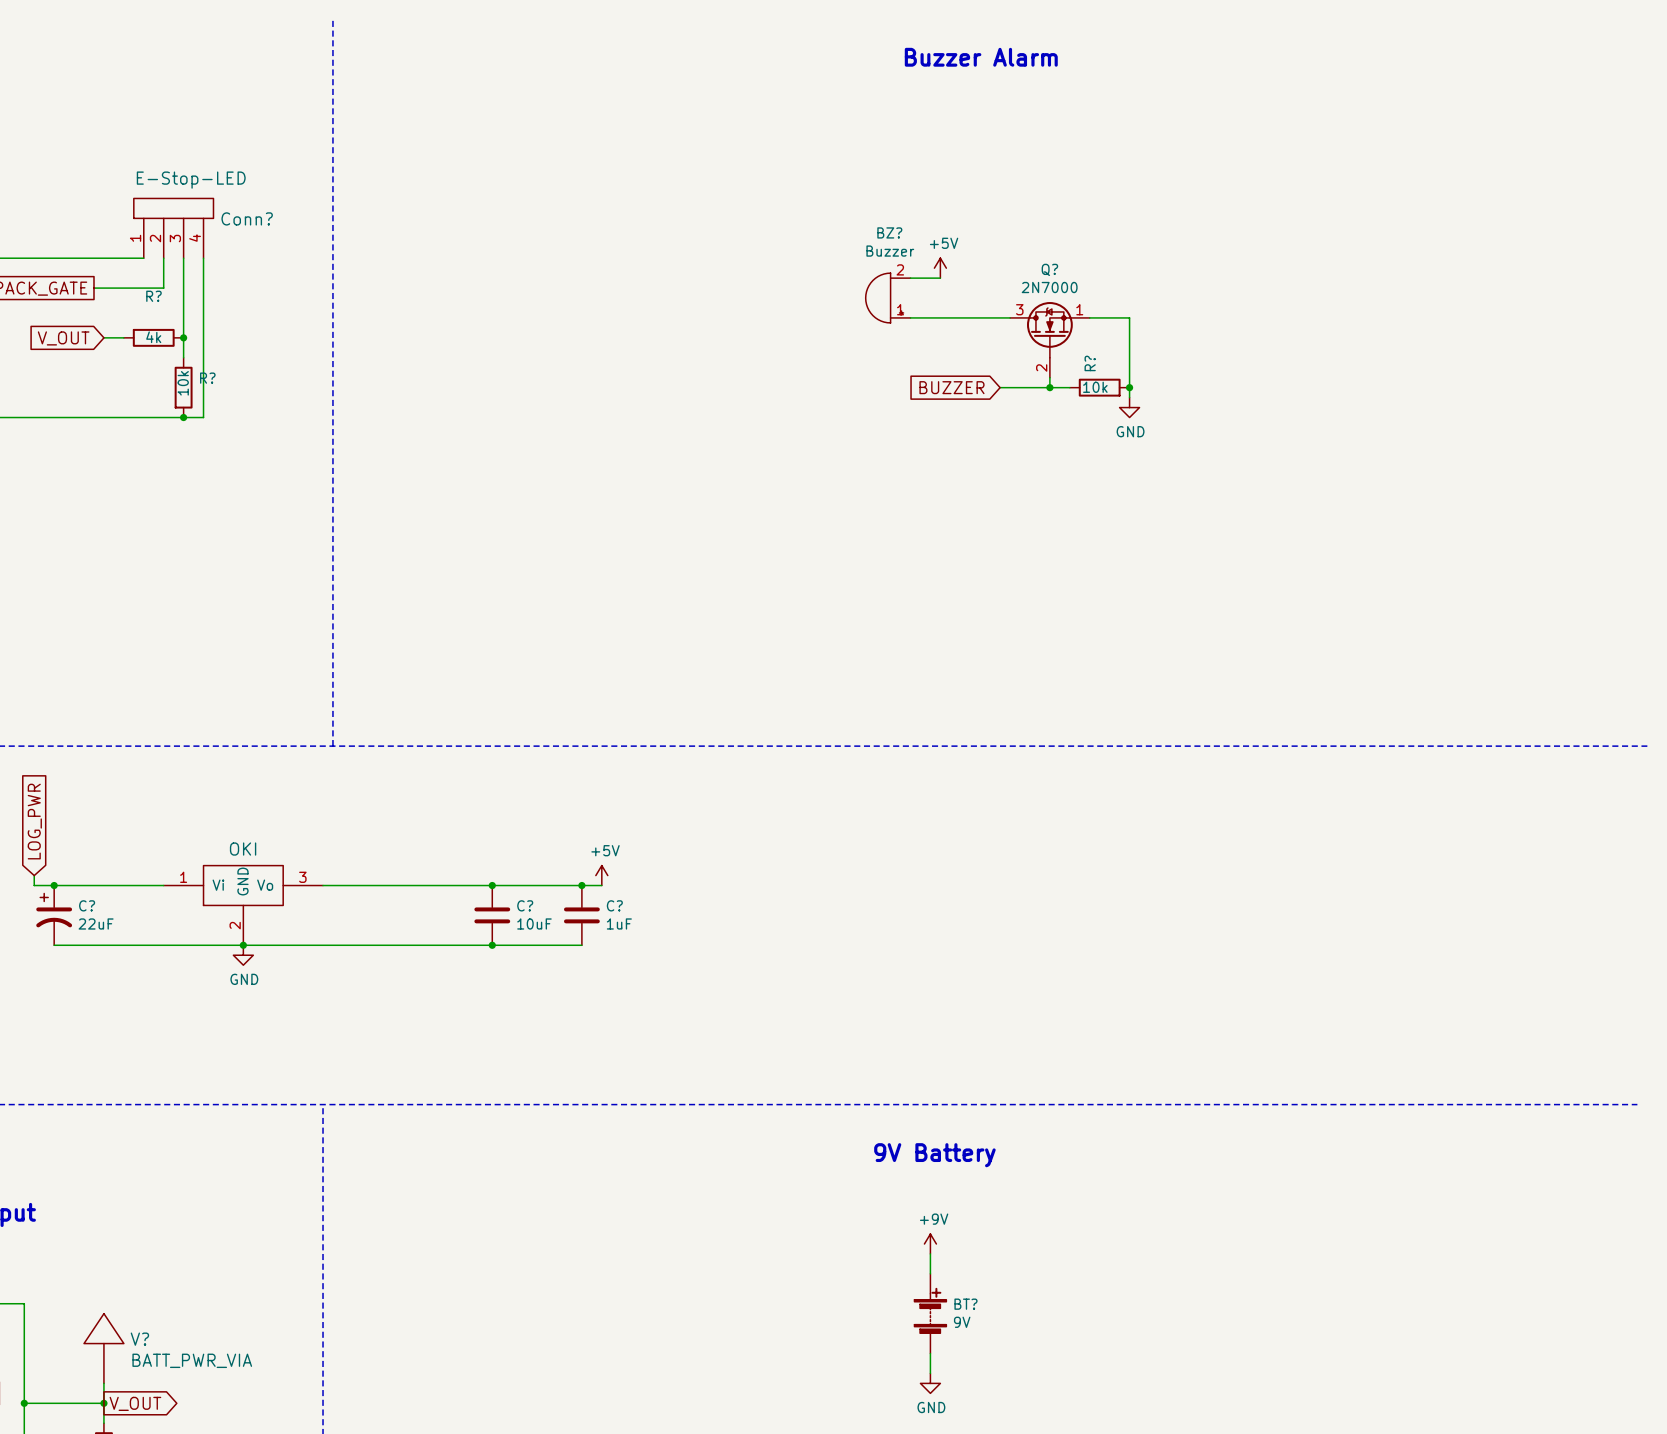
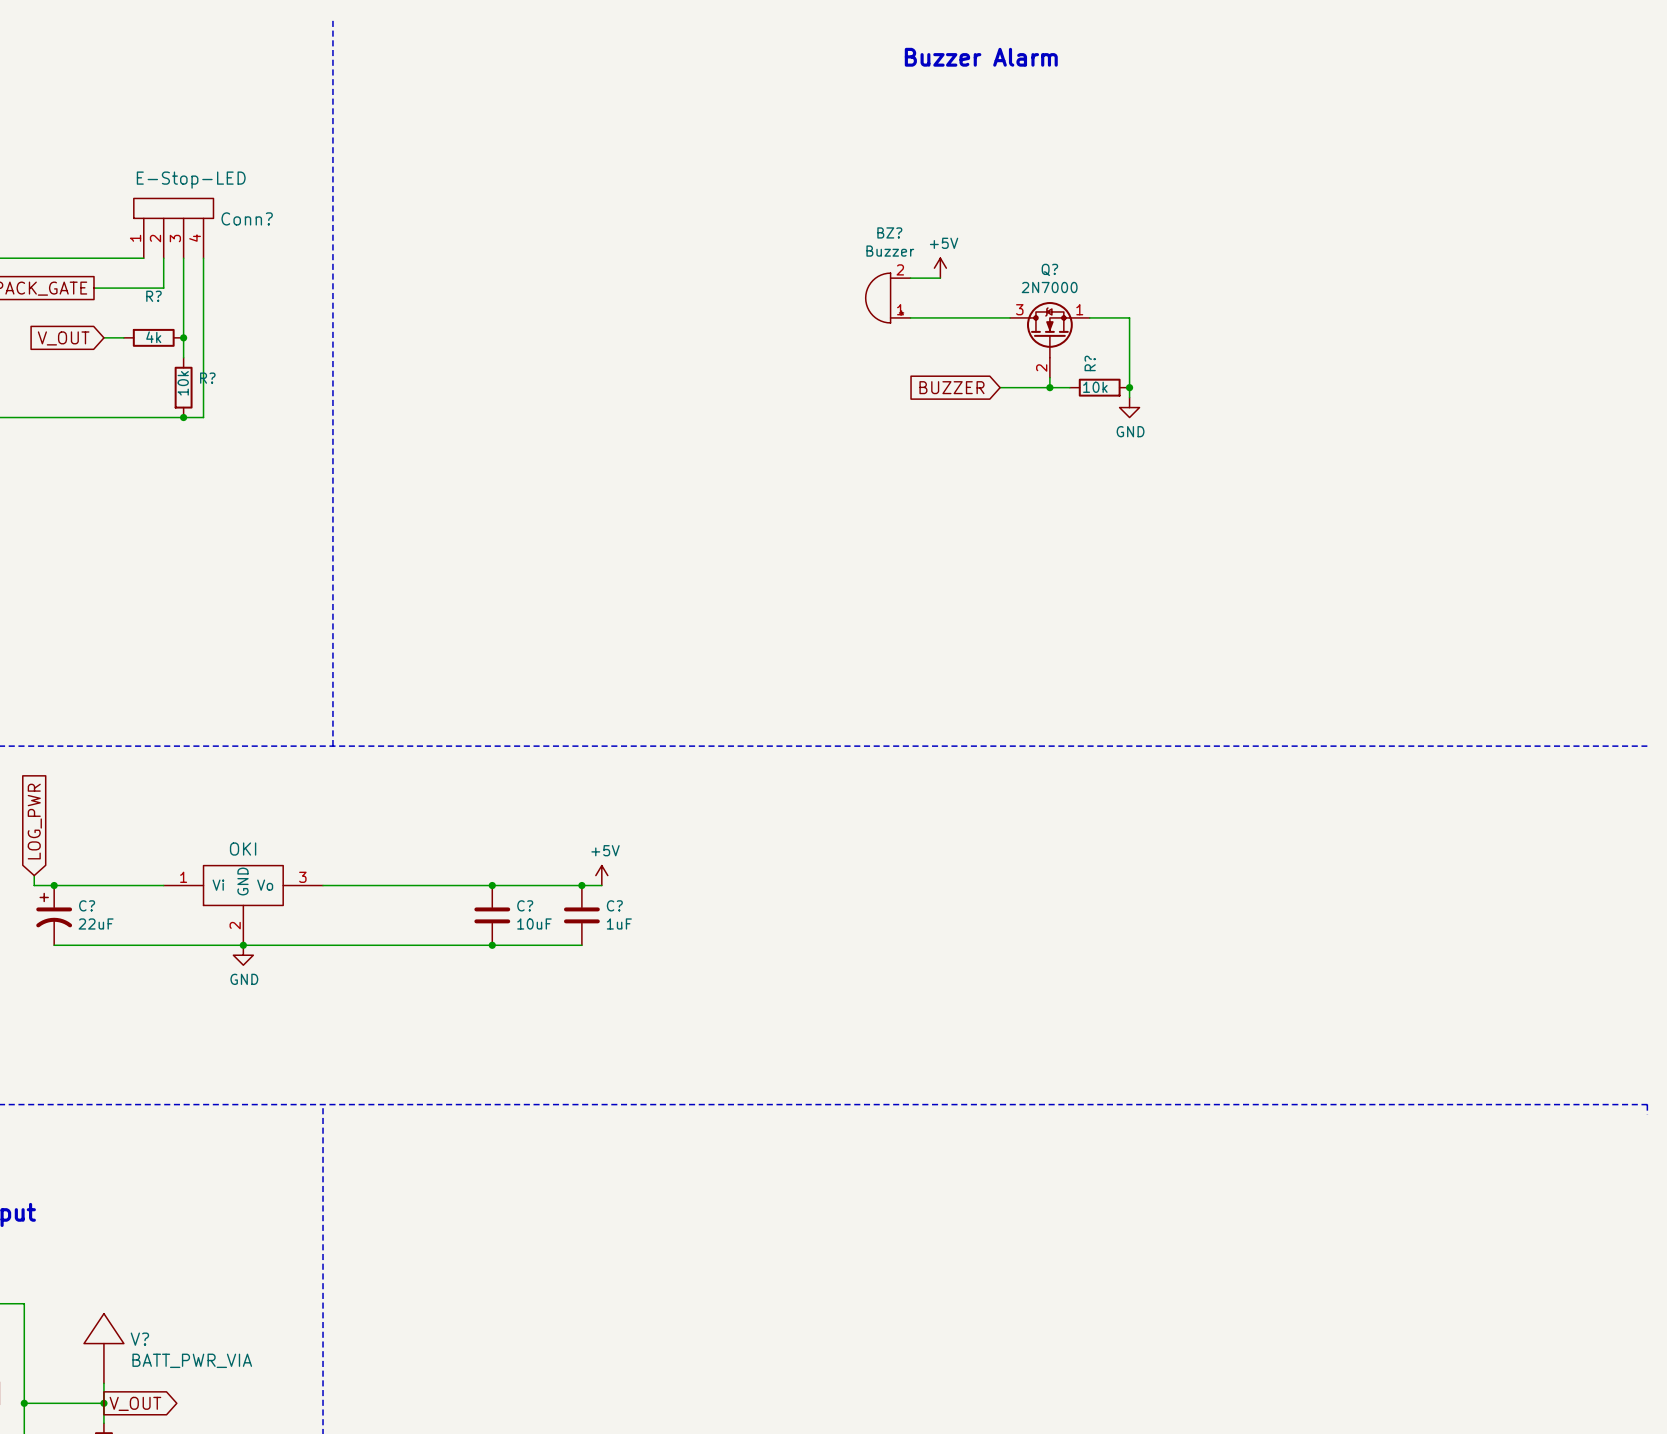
line: none -> (1637, 1104) (1647, 1104) (1647, 1114)
text: 9V Battery (934, 1155) -> none
power symbol: +9V (930, 1243) -> none
wire: (930, 1253) (930, 1273) -> none
BT?: 9V (930, 1313) -> none
wire: (930, 1353) (930, 1373) -> none
power symbol: GND (930, 1383) -> none

